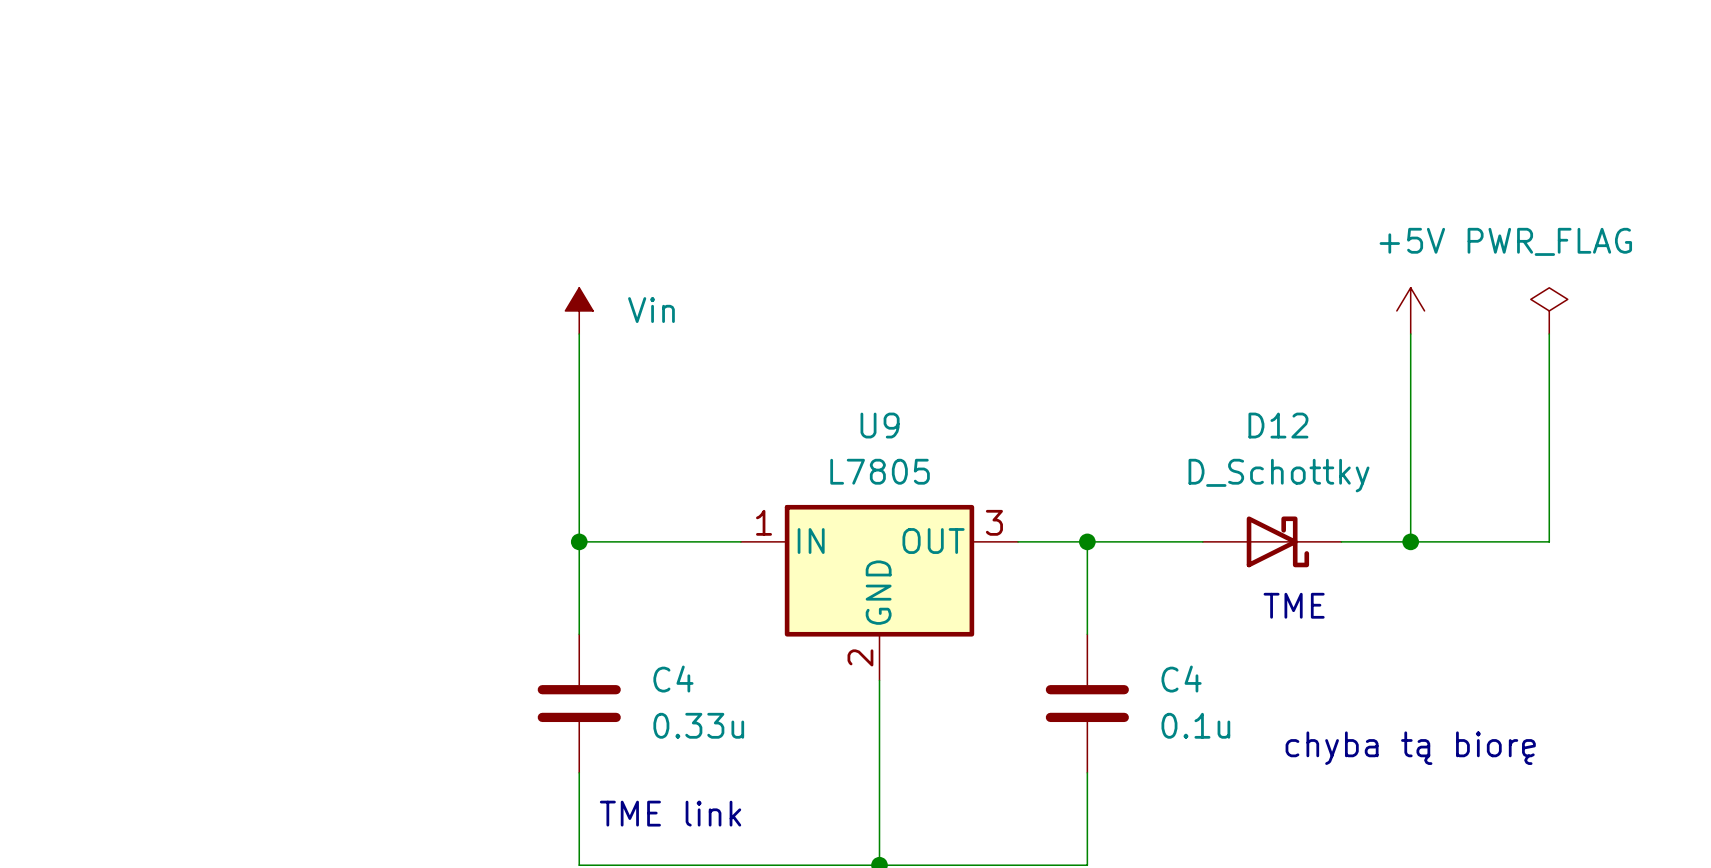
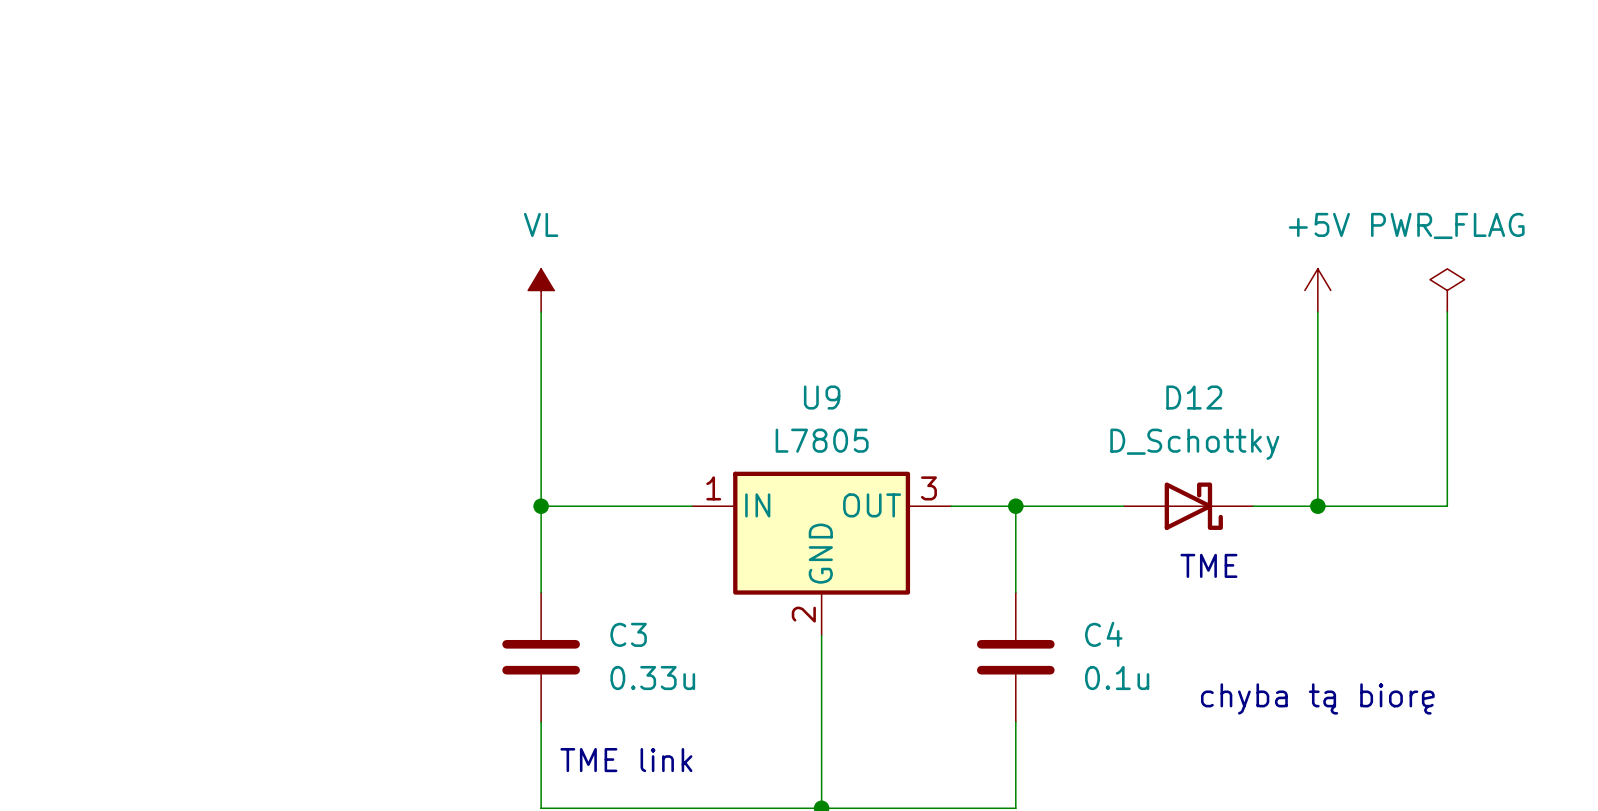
power symbol: Vin (579, 310) -> VL (541, 290)
C4 name: C4 (673, 679) -> C3 (628, 634)

